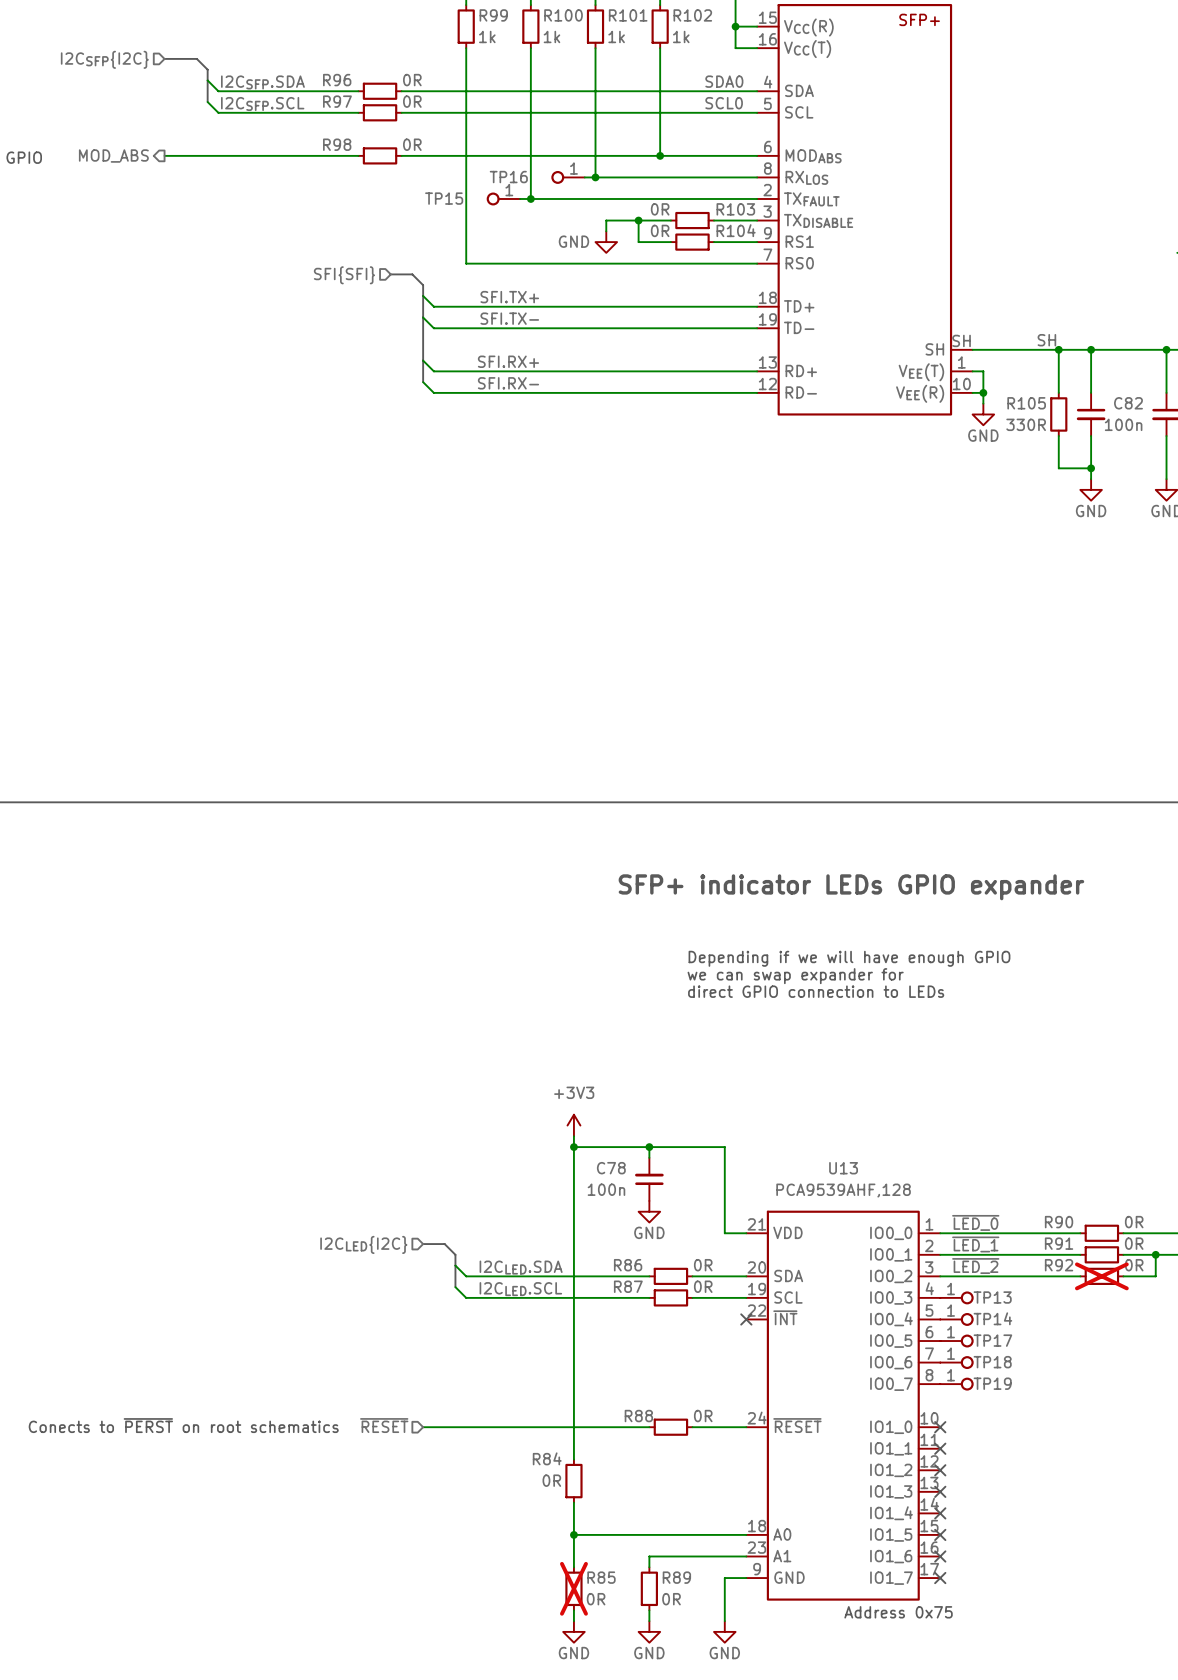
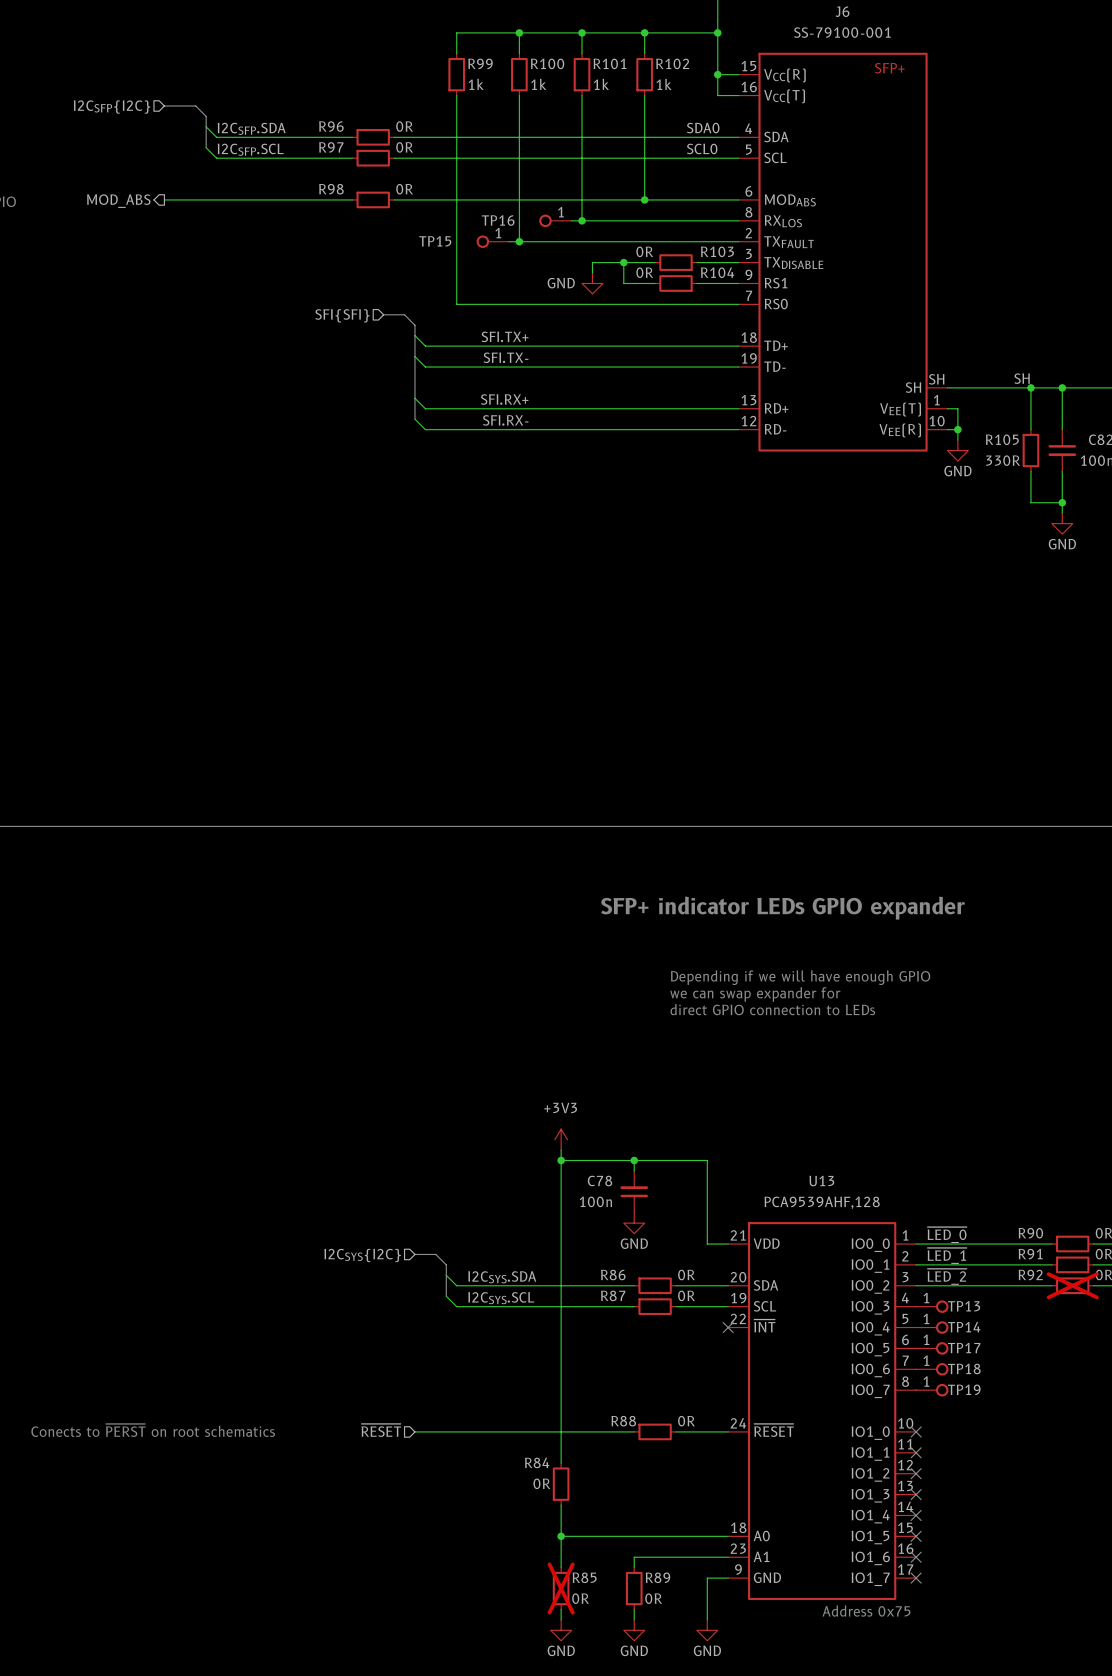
hierarchical label: I2CLED{I2C} (363, 1244) -> I2CSYS{I2C} (362, 1255)
label: I2CLED.SDA (521, 1267) -> I2CSYS.SDA (502, 1277)
label: I2CLED.SCL (520, 1289) -> I2CSYS.SCL (501, 1298)

